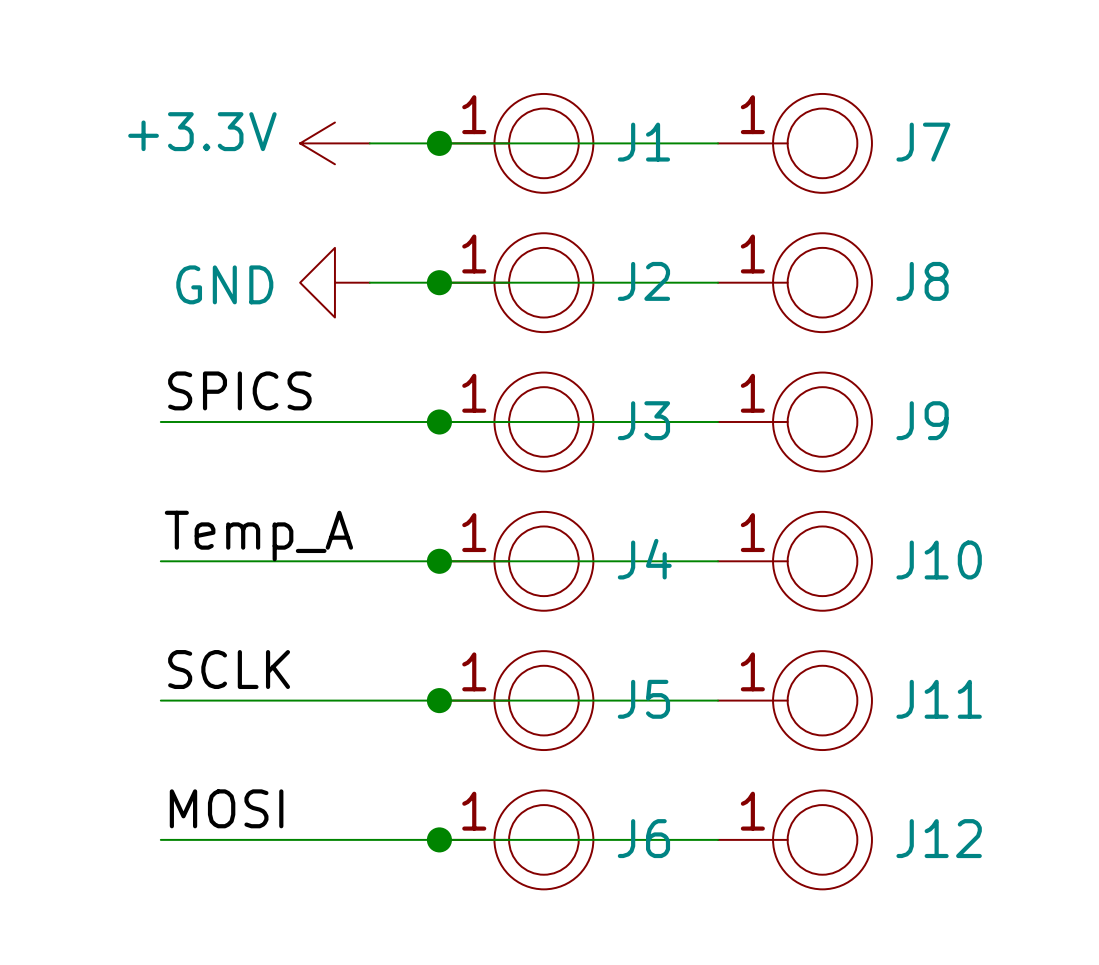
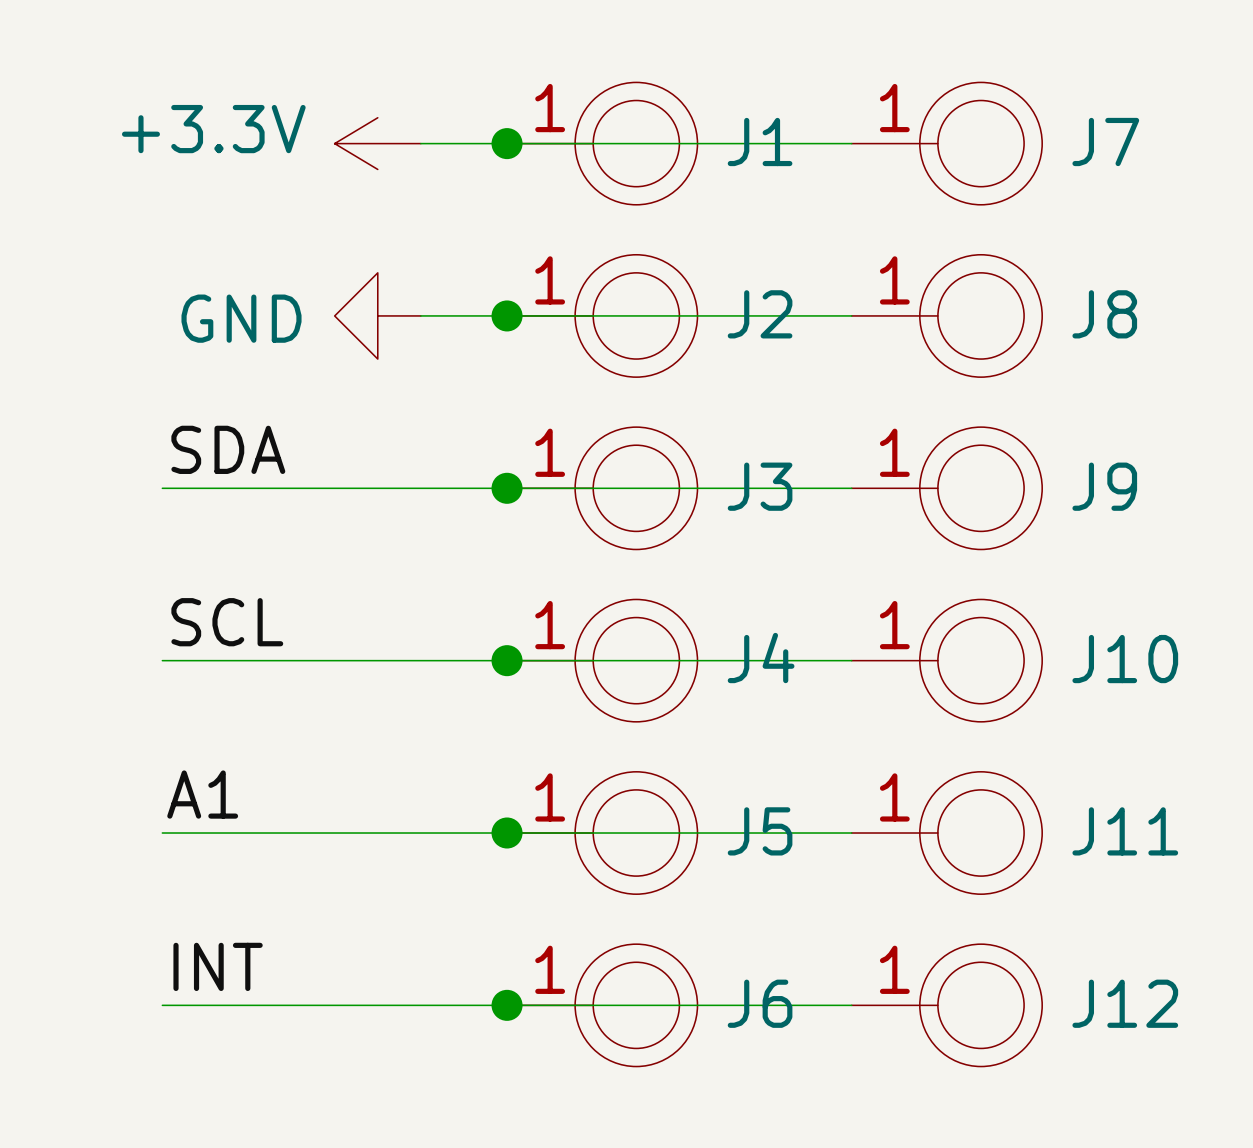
label: SPICS (239, 390) -> SDA (228, 449)
label: Temp_A (258, 536) -> SCL (227, 622)
label: SCLK (229, 669) -> A1 (202, 794)
label: MOSI (226, 808) -> INT (218, 966)

